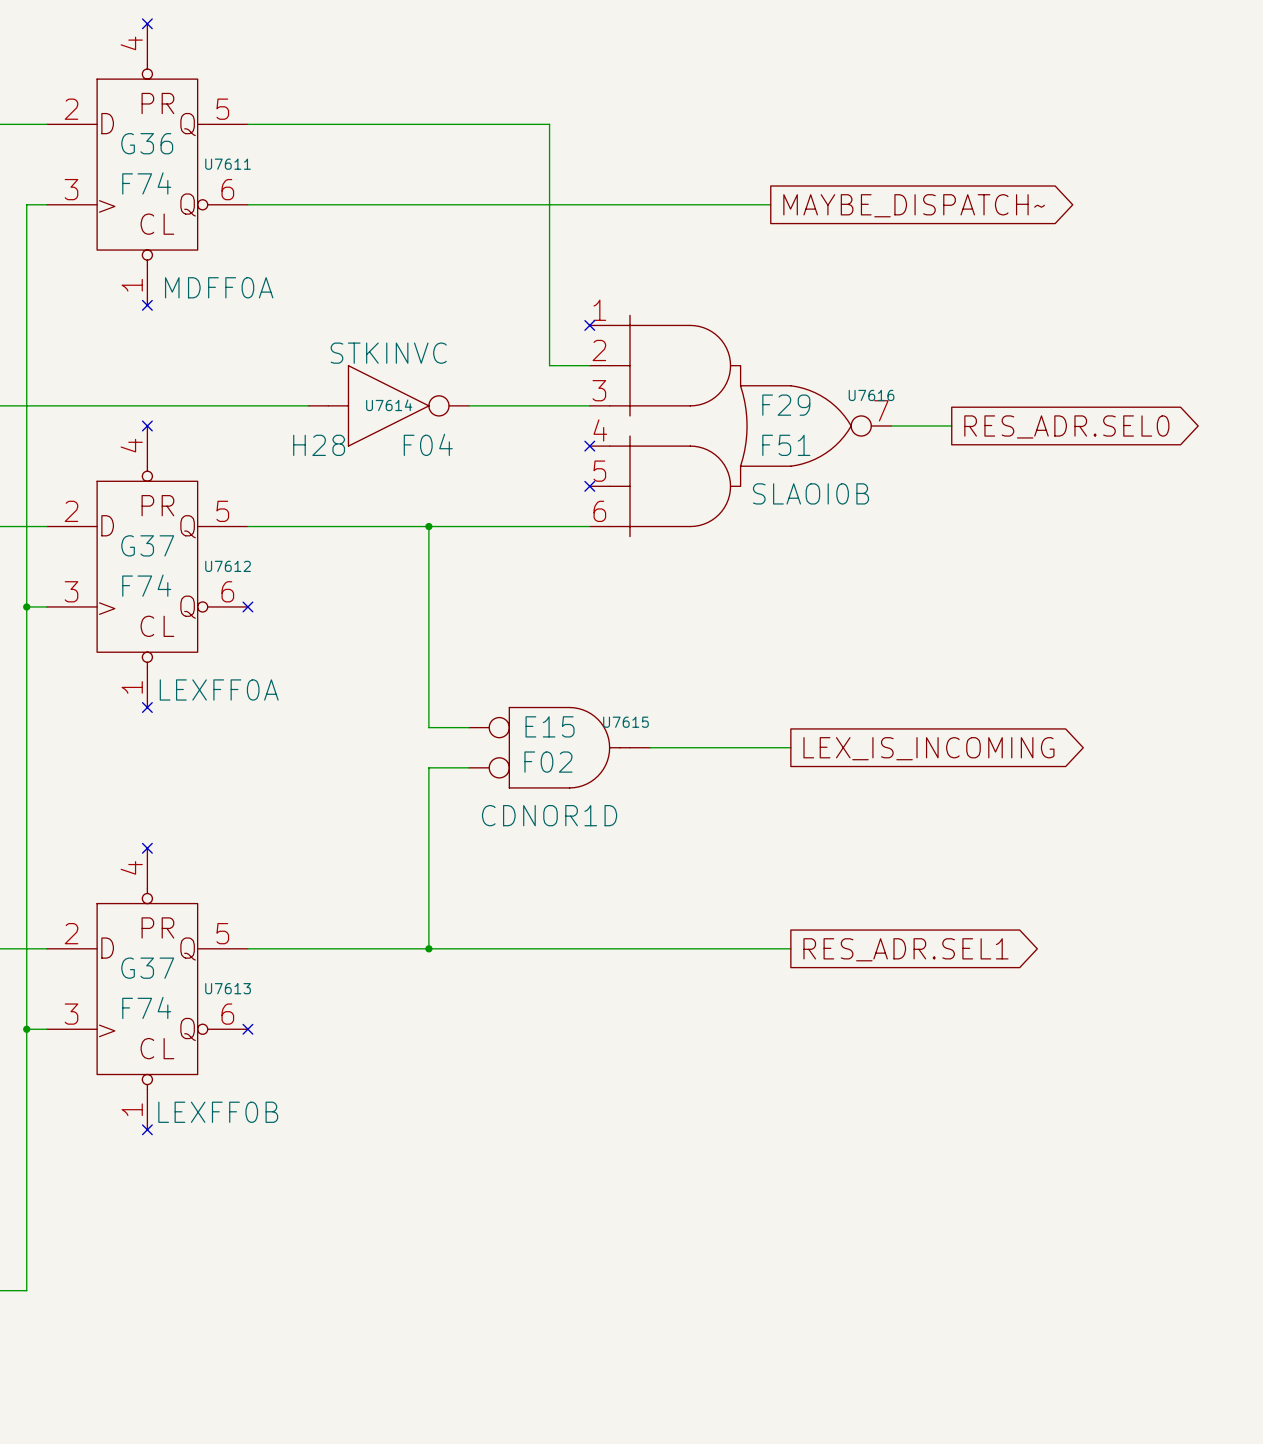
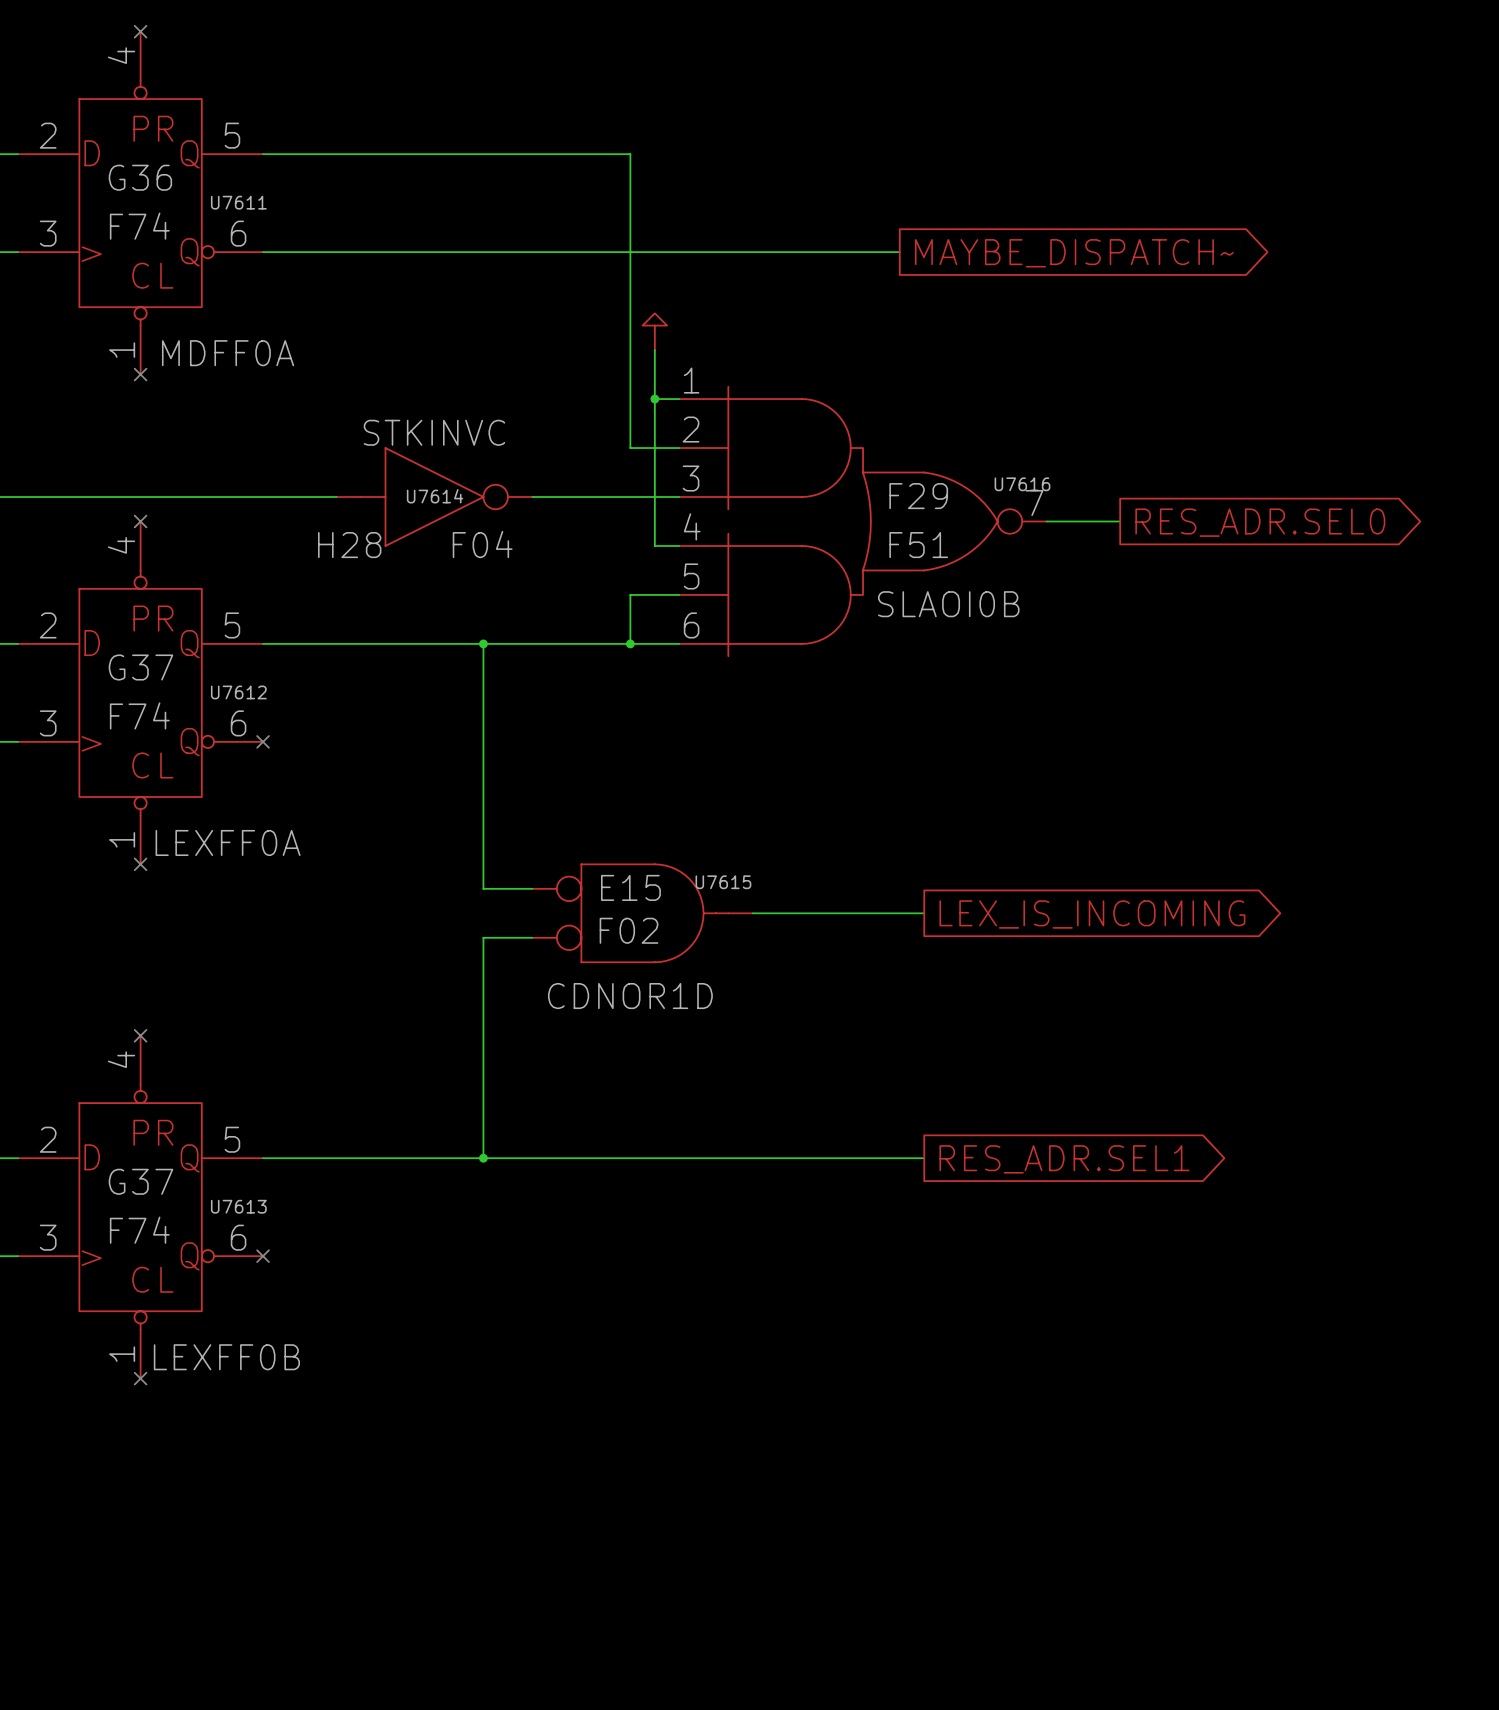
power symbol: none -> (654, 331)
wire: none -> (654, 350) (654, 545) (679, 545)
wire: none -> (654, 399) (679, 399)
junction: none -> (654, 399)
no-connect mark: (589, 325) -> none
no-connect mark: (589, 446) -> none
wire: none -> (679, 594) (630, 594) (630, 643)
no-connect mark: (589, 486) -> none
junction: none -> (630, 643)

